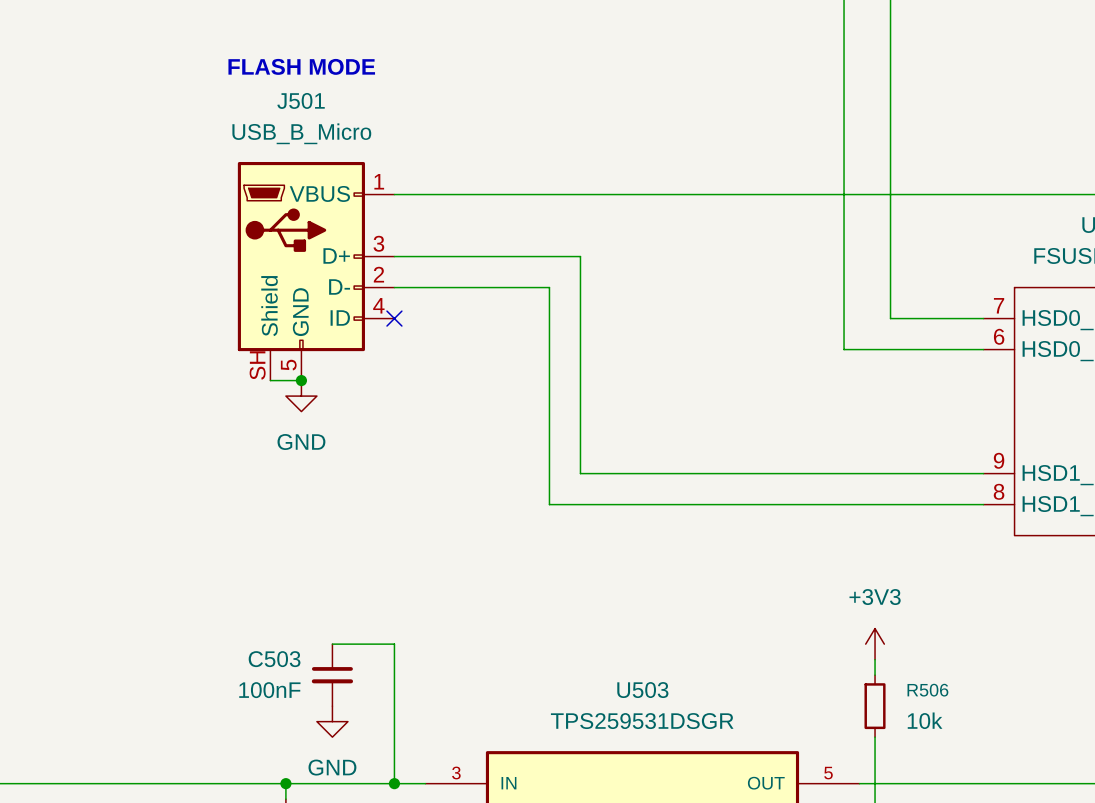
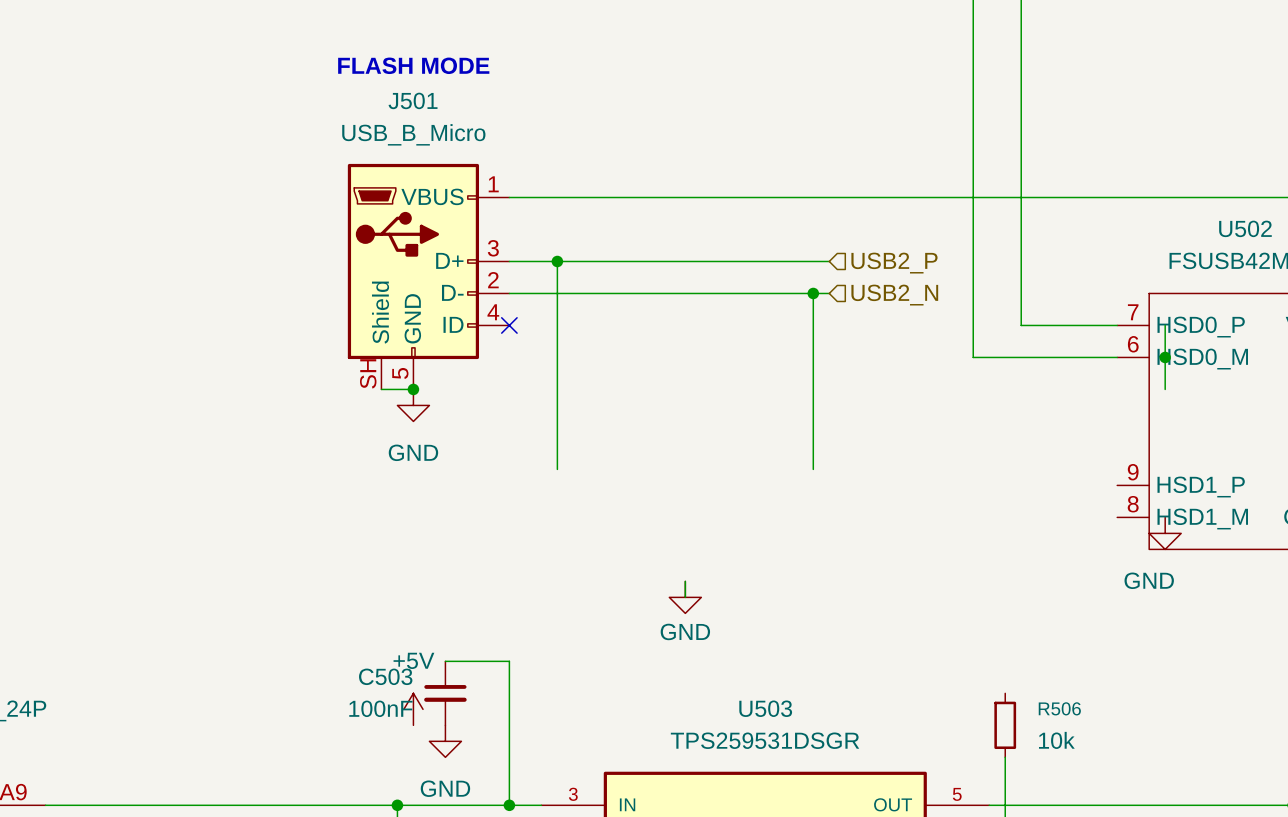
wire: none -> (557, 261) (557, 469)
junction: none -> (557, 261)
wire: (580, 256) (580, 473) (983, 473) -> (701, 261) (829, 261)
hierarchical label: none -> USB2_P (894, 263)
wire: (549, 287) (549, 504) (983, 504) -> (669, 293) (829, 293)
wire: none -> (813, 293) (813, 469)
junction: none -> (813, 293)
hierarchical label: none -> USB2_N (894, 295)
wire: none -> (1165, 325) (1165, 389)
junction: none -> (1165, 357)
power symbol: none -> GND (1165, 533)
wire: none -> (685, 581) (685, 597)
power symbol: none -> GND (685, 597)
power symbol: +3V3 (875, 644) -> none
wire: (875, 659) (875, 675) -> none
power symbol: none -> +5V (413, 709)

